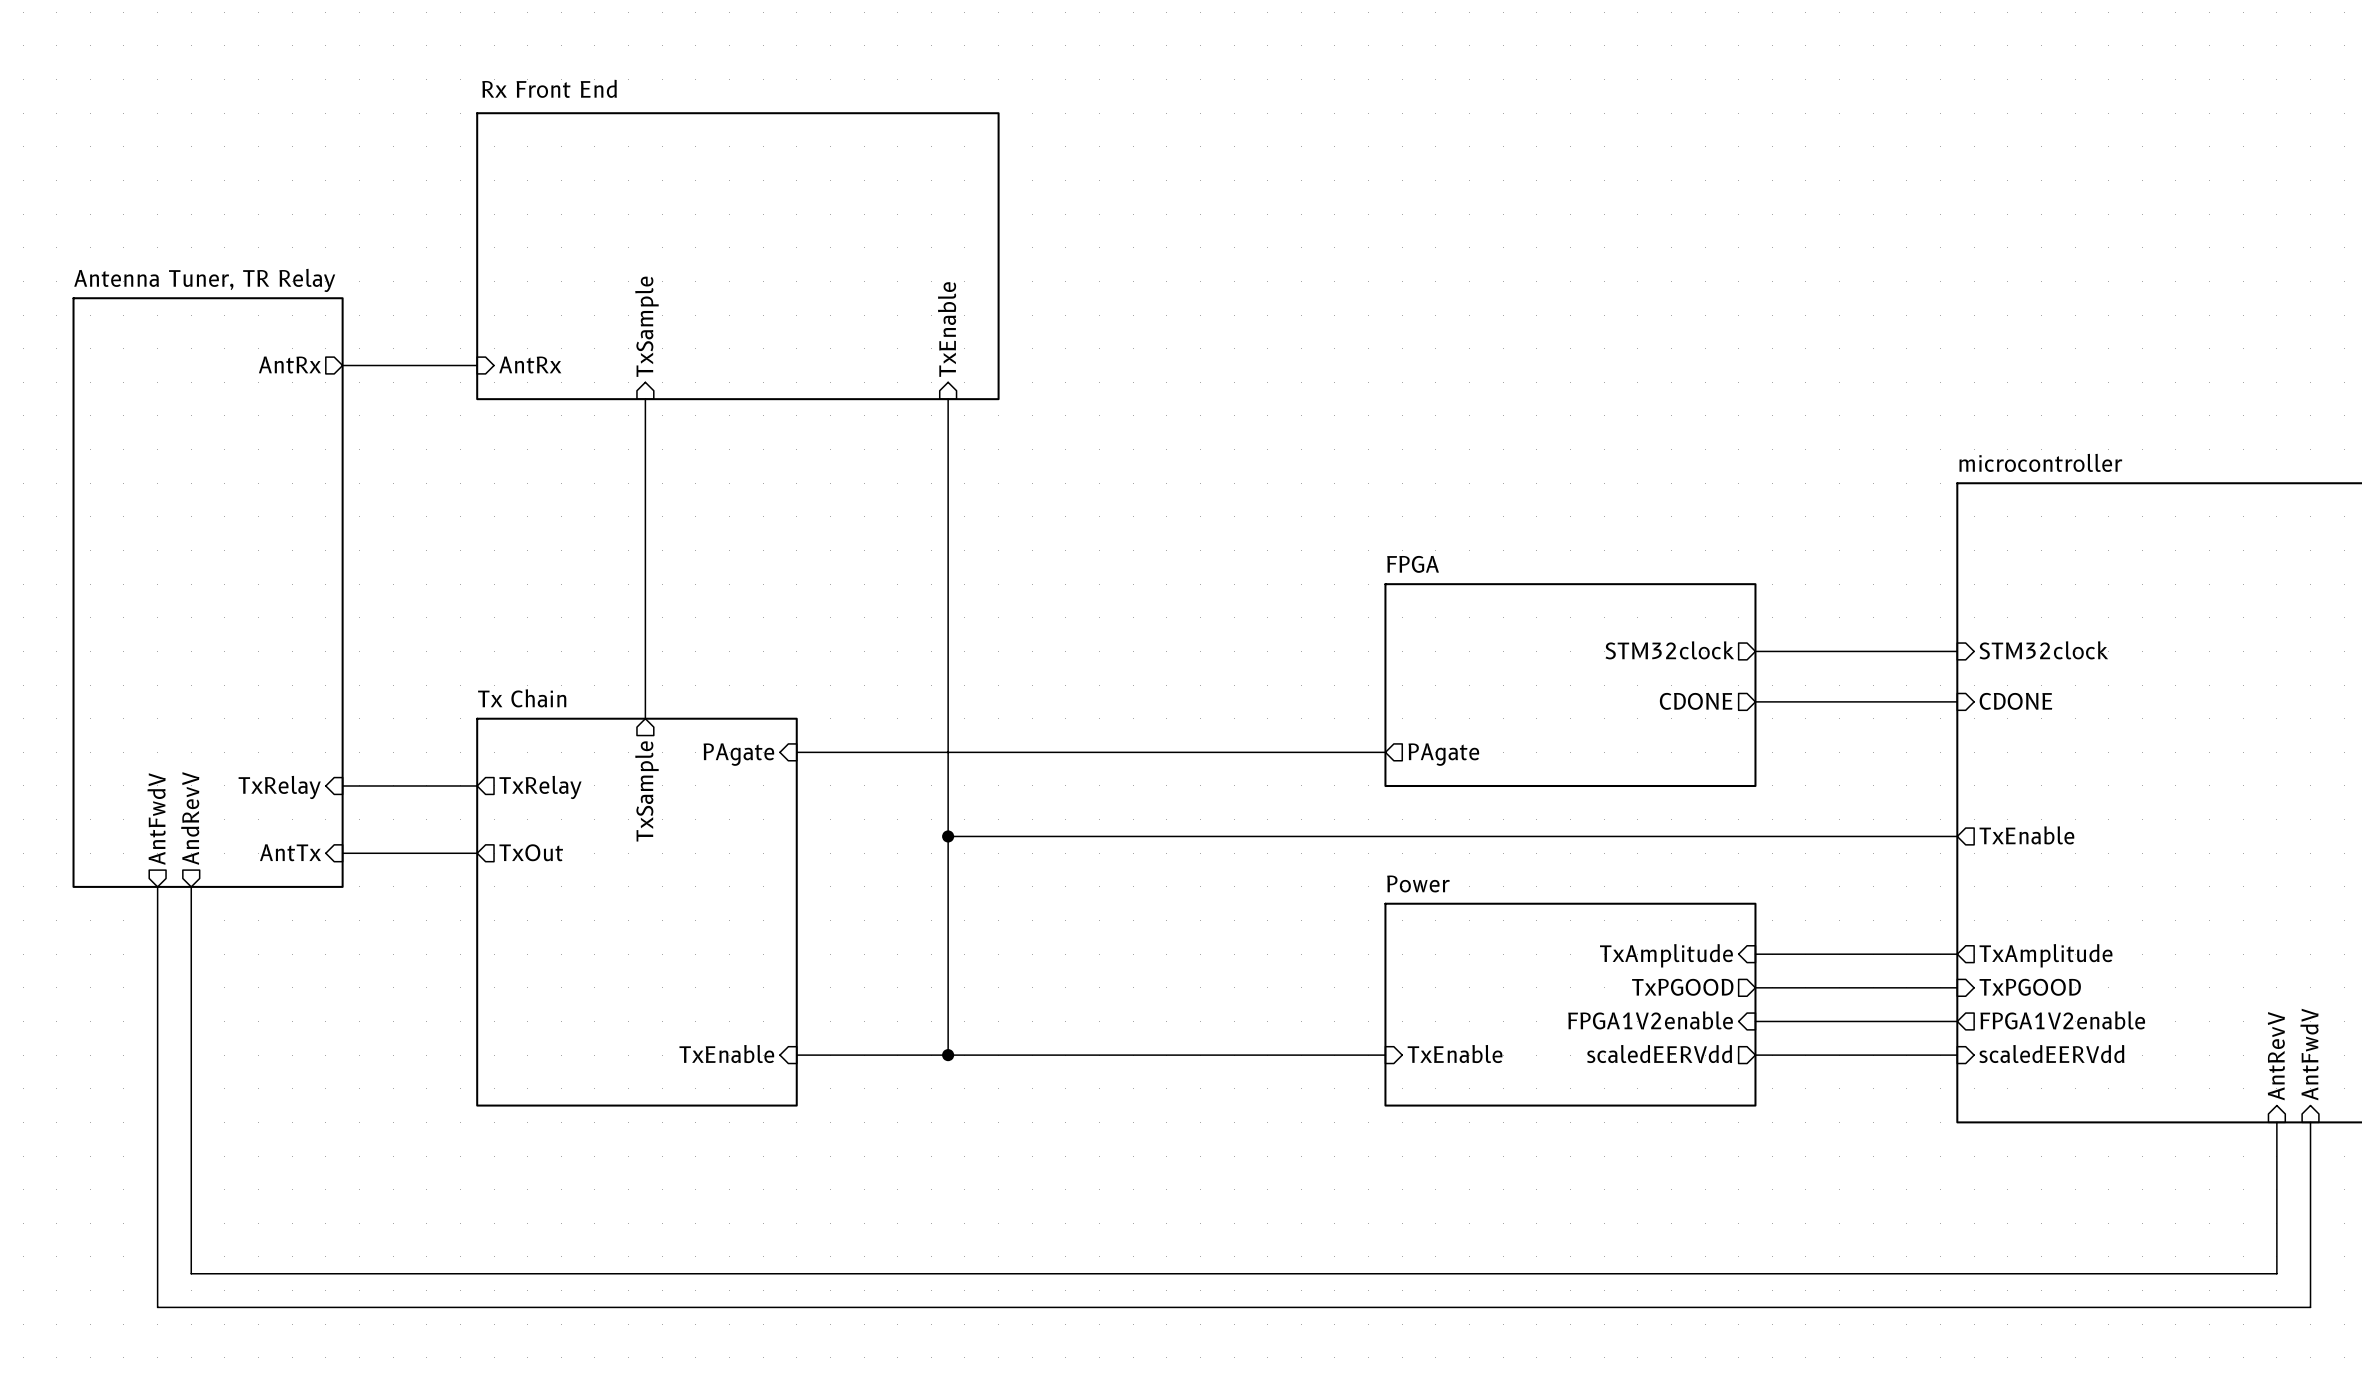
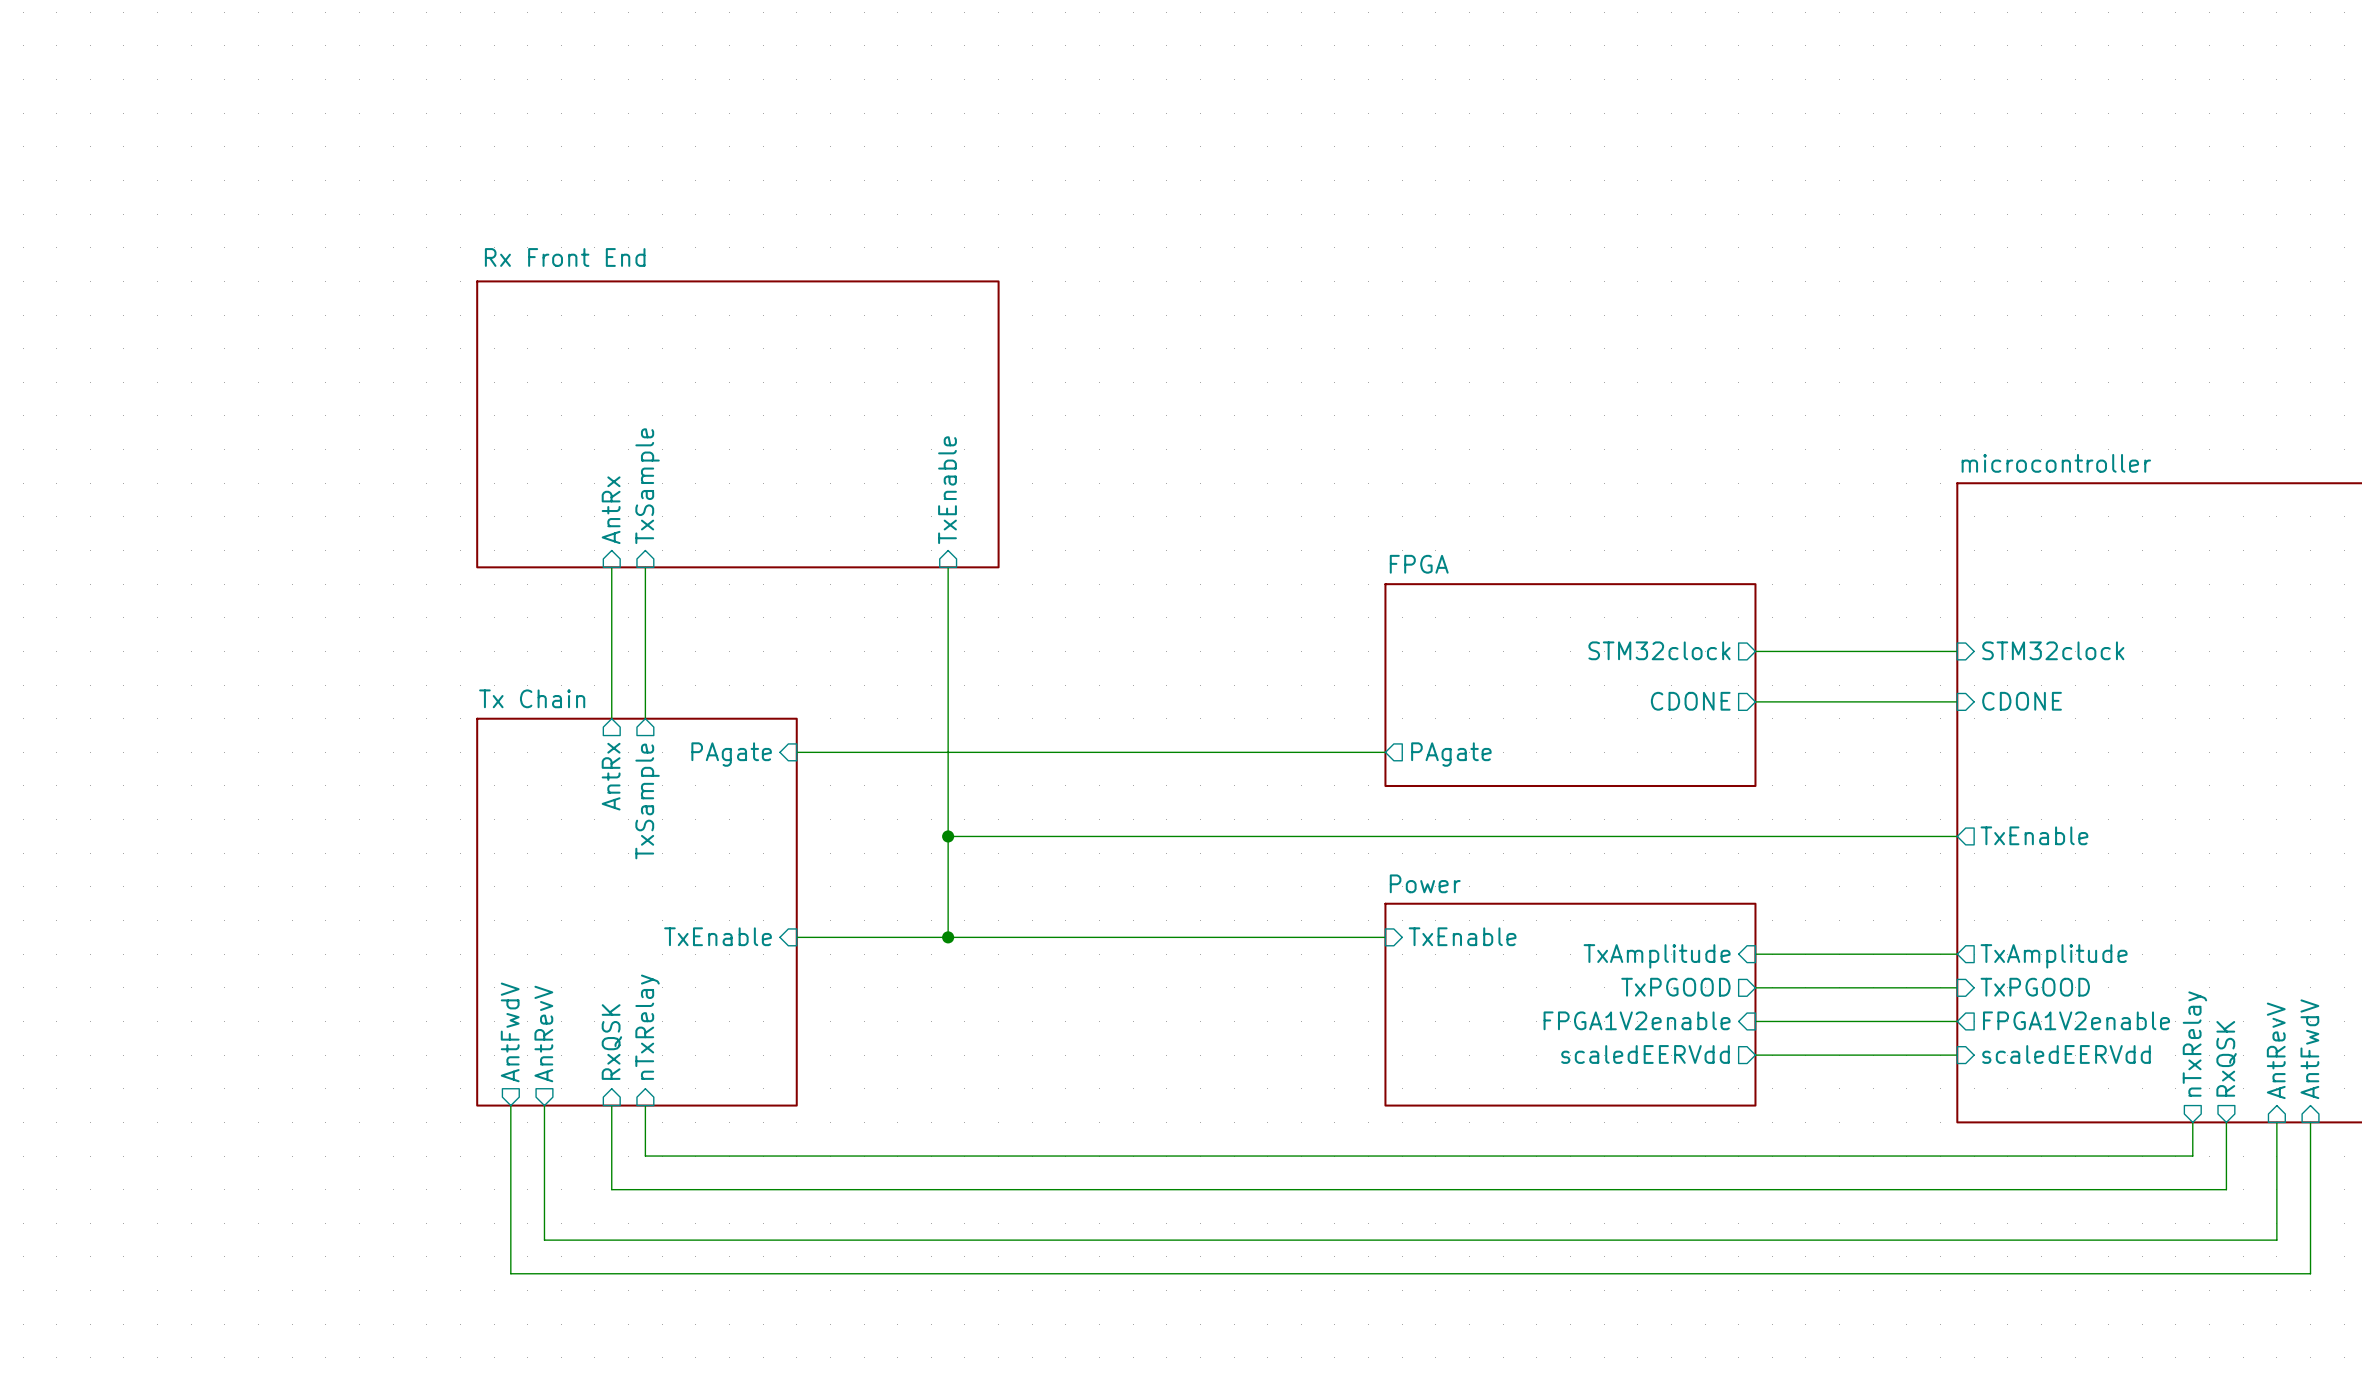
sheet Rx Front End position: (737, 256) -> (737, 424)
sheet pin position: TxSample (646, 326) -> TxSample (647, 486)
sheet pin position: TxEnable (947, 329) -> TxEnable (947, 490)
sheet pin: AntRx (289, 364) -> none
sheet pin: AntRx (530, 364) -> none
wire: (342, 365) (477, 365) -> none
wire: (645, 399) (645, 567) -> none
wire: (948, 399) (948, 567) -> none
sheet pin: none -> AntRx (611, 510)
wire: none -> (611, 567) (611, 718)
sheet Antenna Tuner, TR Relay: (208, 592) -> none
sheet pin: none -> AntRx (611, 776)
wire: (342, 785) (477, 785) -> none
sheet pin: TxRelay (279, 787) -> none
sheet pin: TxRelay (540, 787) -> none
sheet pin: AndRevV (190, 818) -> none
sheet pin: AntFwdV (156, 819) -> none
sheet pin: AntTx (290, 852) -> none
sheet pin: TxOut (531, 852) -> none
wire: (342, 853) (477, 853) -> none
wire: (157, 886) (157, 1307) (2310, 1307) (2310, 1273) -> none
wire: (191, 886) (191, 1273) (510, 1273) -> (510, 1105) (510, 1273)
wire: (948, 937) (948, 1055) -> none
junction: none -> (948, 937)
sheet pin: none -> nTxRelay (647, 1027)
sheet pin: none -> AntFwdV (510, 1032)
sheet pin: none -> AntRevV (543, 1034)
sheet pin: none -> RxQSK (611, 1042)
sheet pin: none -> nTxRelay (2194, 1044)
sheet pin position: TxEnable (726, 1054) -> TxEnable (718, 936)
sheet pin position: TxEnable (1455, 1054) -> TxEnable (1462, 936)
wire: (796, 1055) (1385, 1055) -> (796, 937) (1385, 937)
junction: (948, 1055) -> none
sheet pin: none -> RxQSK (2226, 1058)
wire: none -> (544, 1105) (544, 1240) (2276, 1240)
wire: none -> (611, 1105) (611, 1189) (2226, 1189) (2226, 1122)
wire: none -> (645, 1105) (645, 1156) (2192, 1156) (2192, 1122)
wire: (2276, 1240) (2276, 1273) -> (2310, 1273) (2276, 1273)

